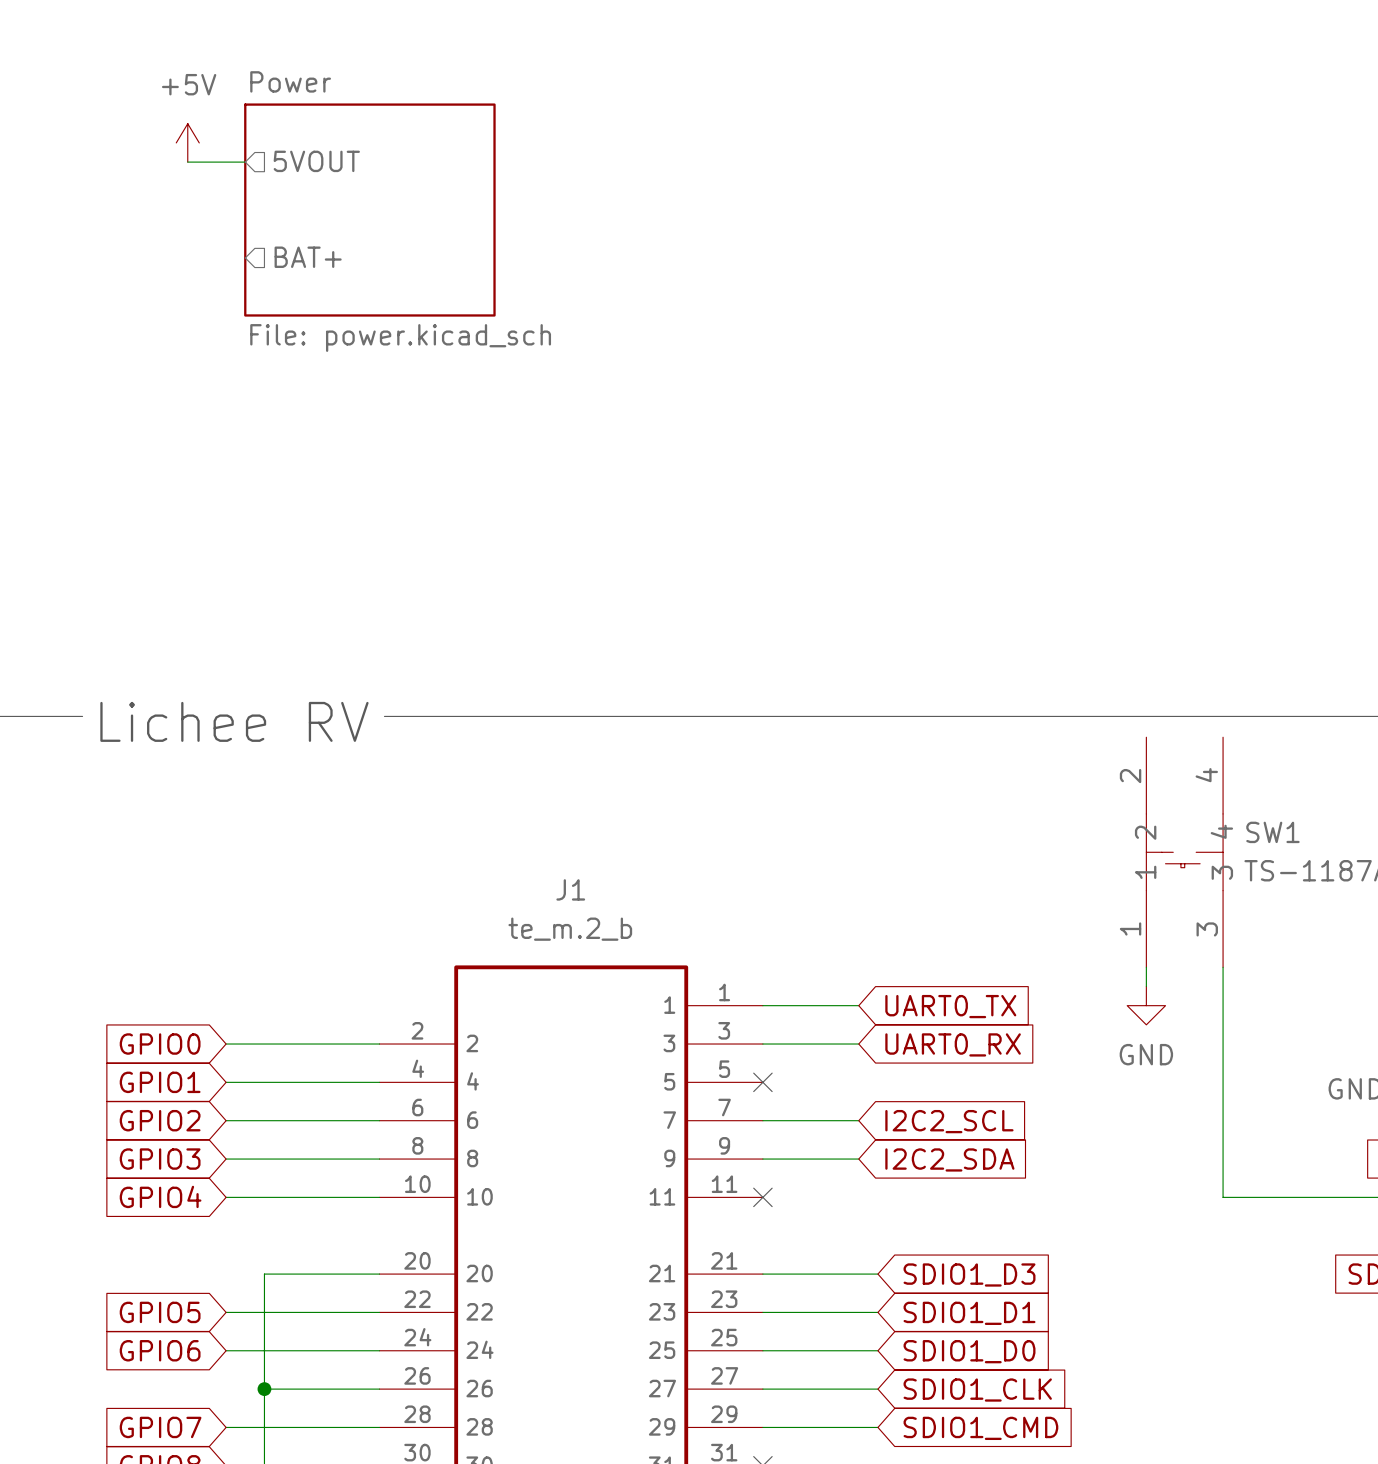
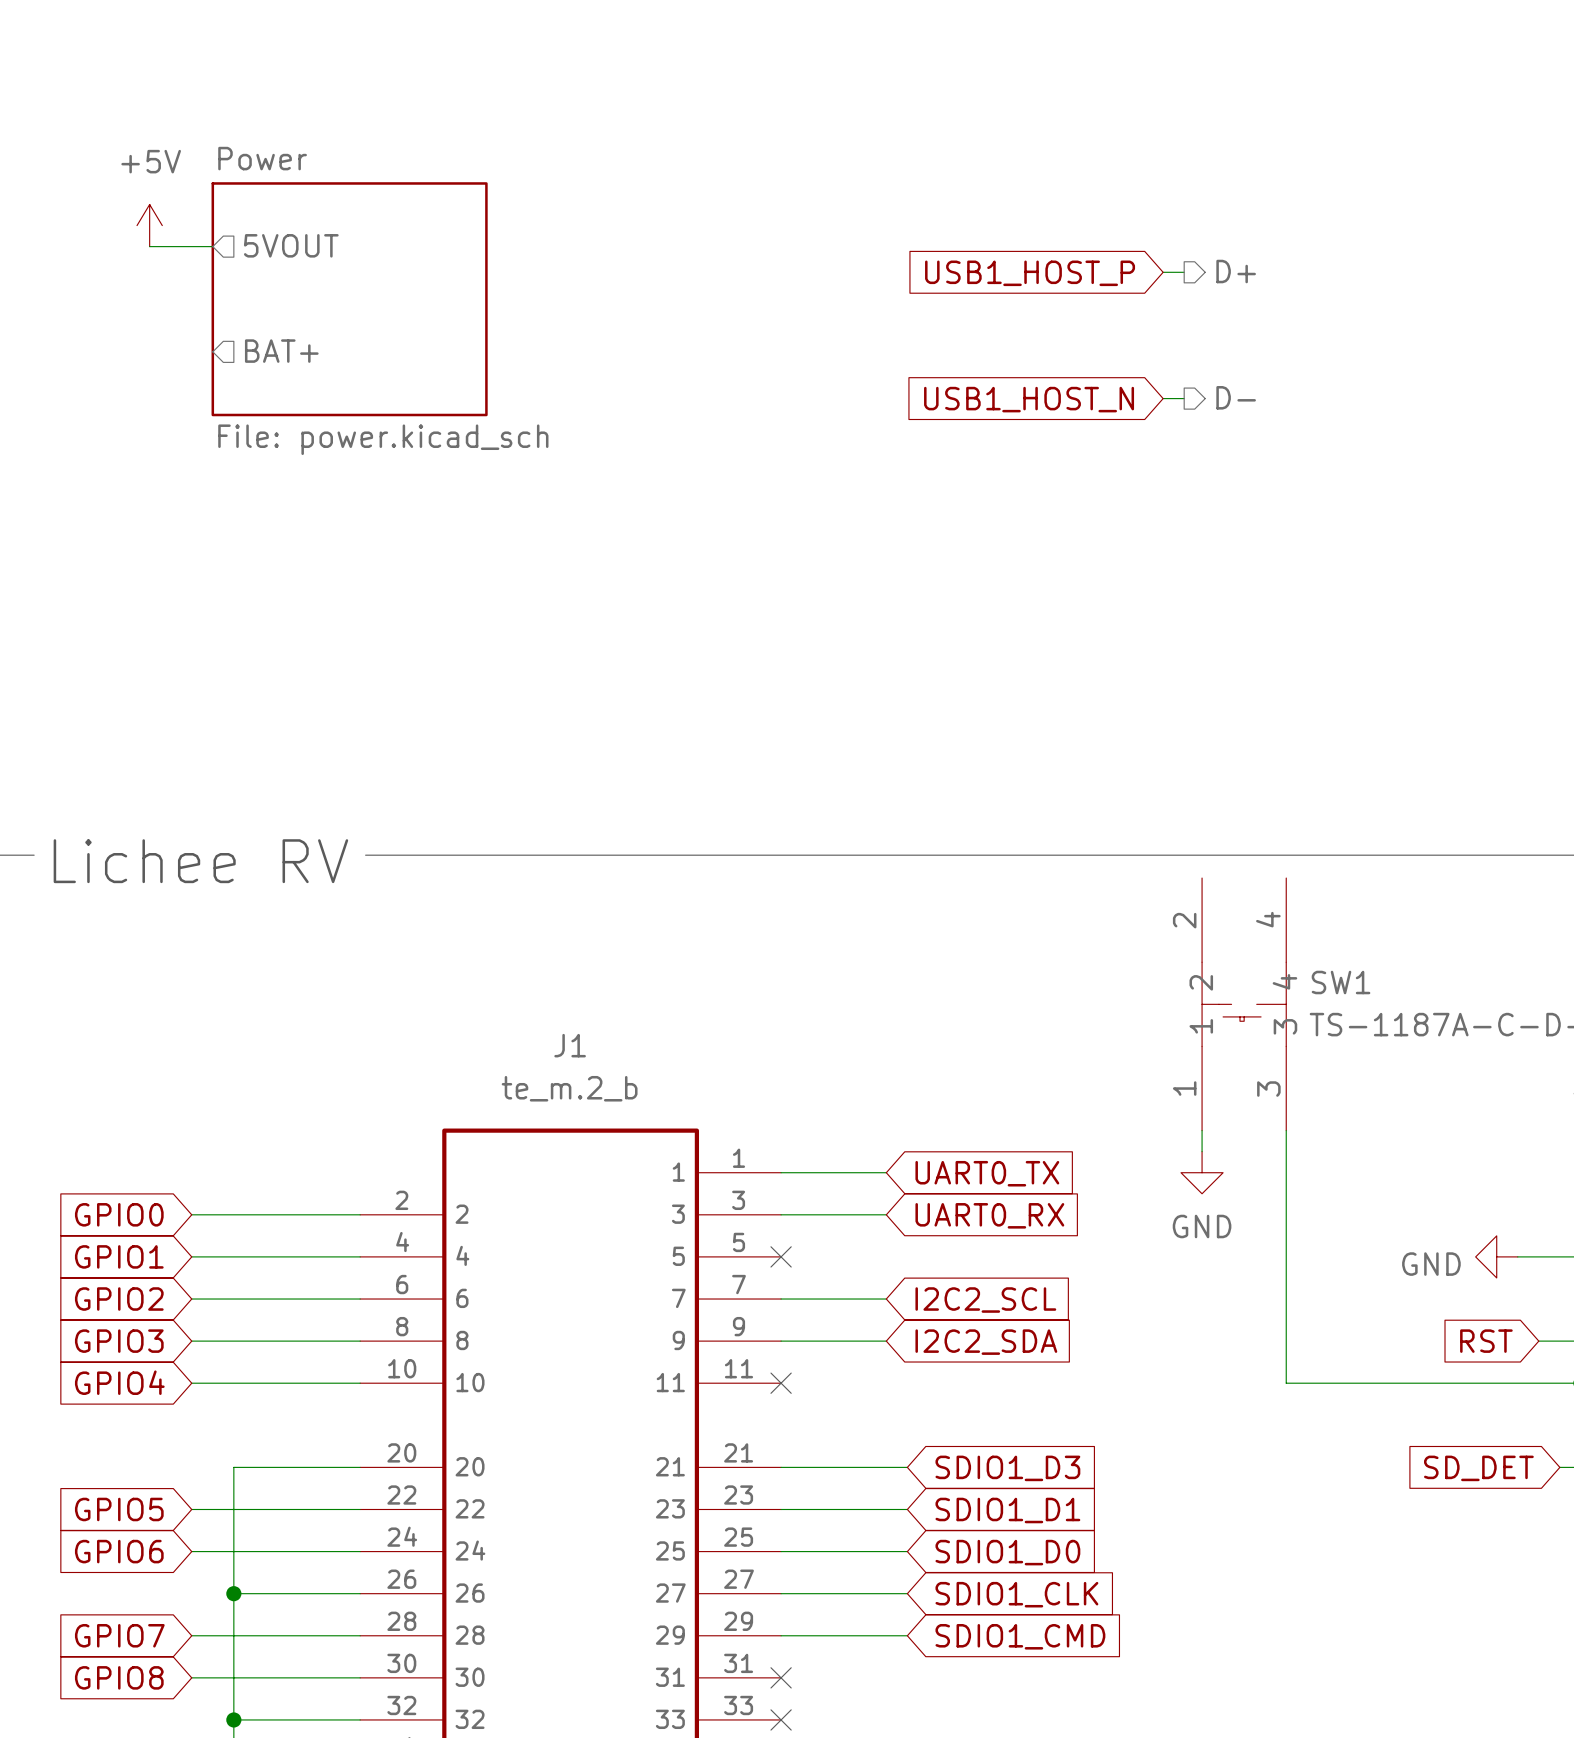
sheet pin: none -> D+ (1236, 271)
wire: none -> (1163, 272) (1184, 272)
global label: none -> USB1_HOST_P (1030, 273)
sheet pin: none -> D- (1236, 397)
wire: none -> (1163, 398) (1184, 398)
global label: none -> USB1_HOST_N (1029, 399)

